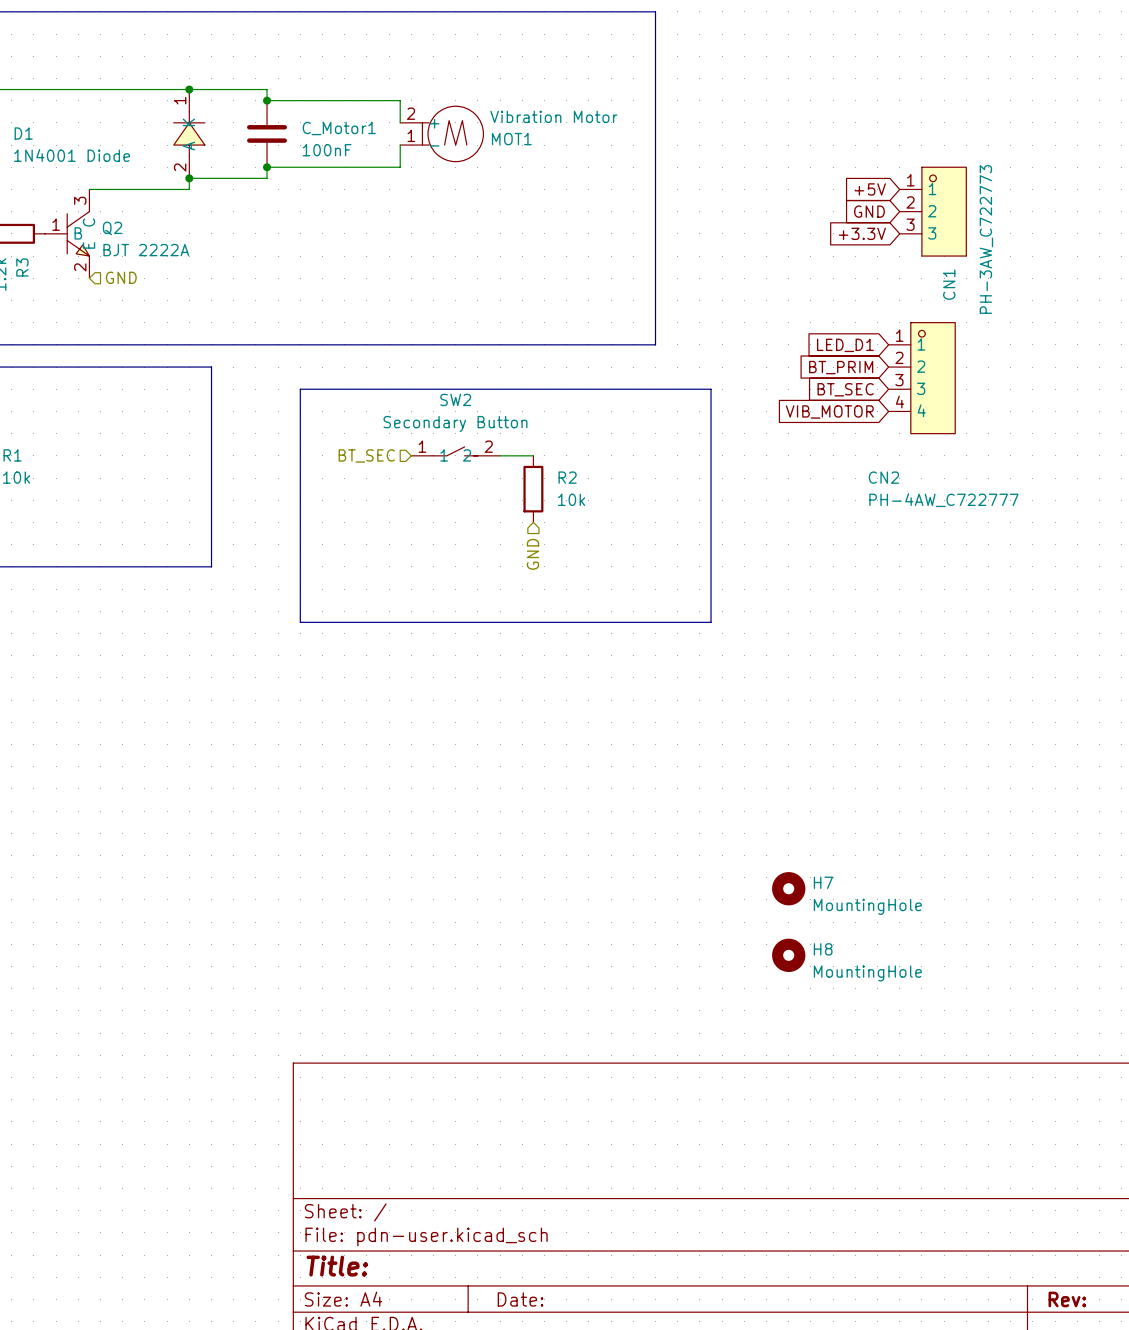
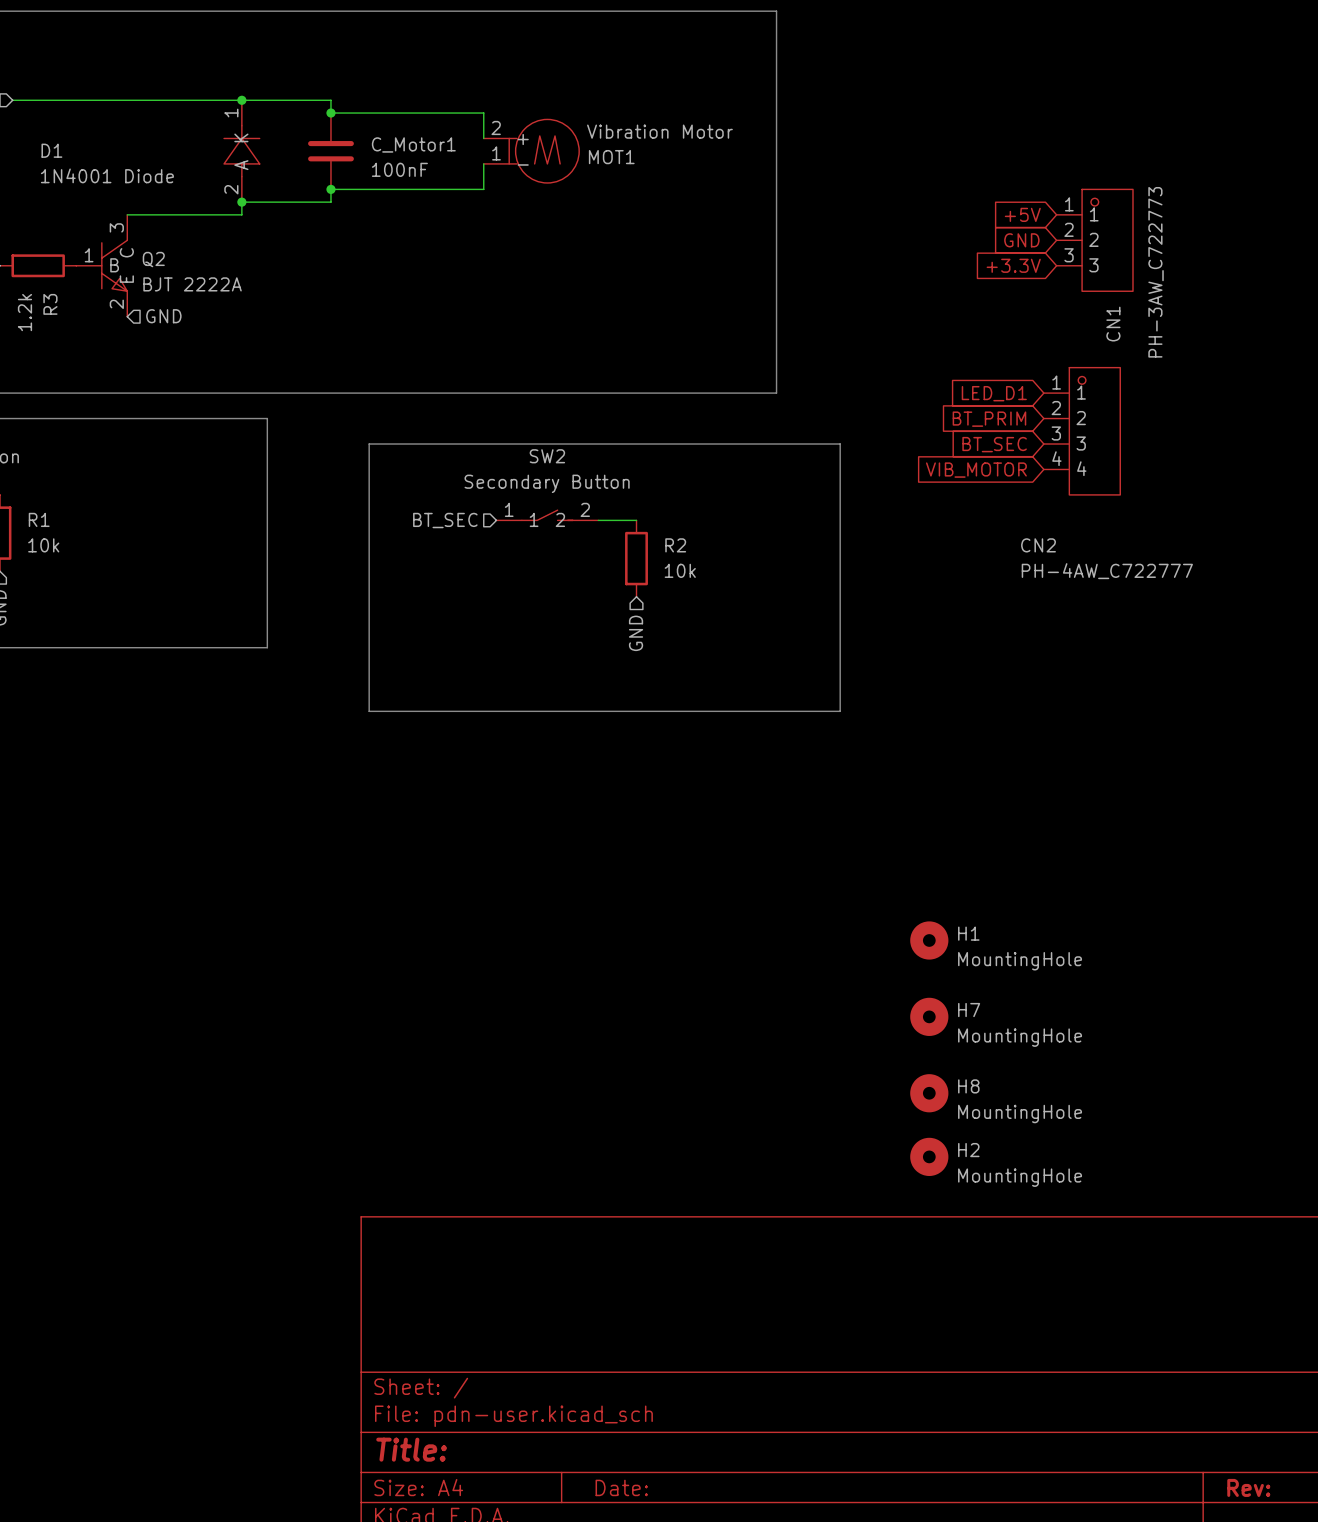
H1: none -> MountingHole (929, 940)
H2: none -> MountingHole (929, 1156)

